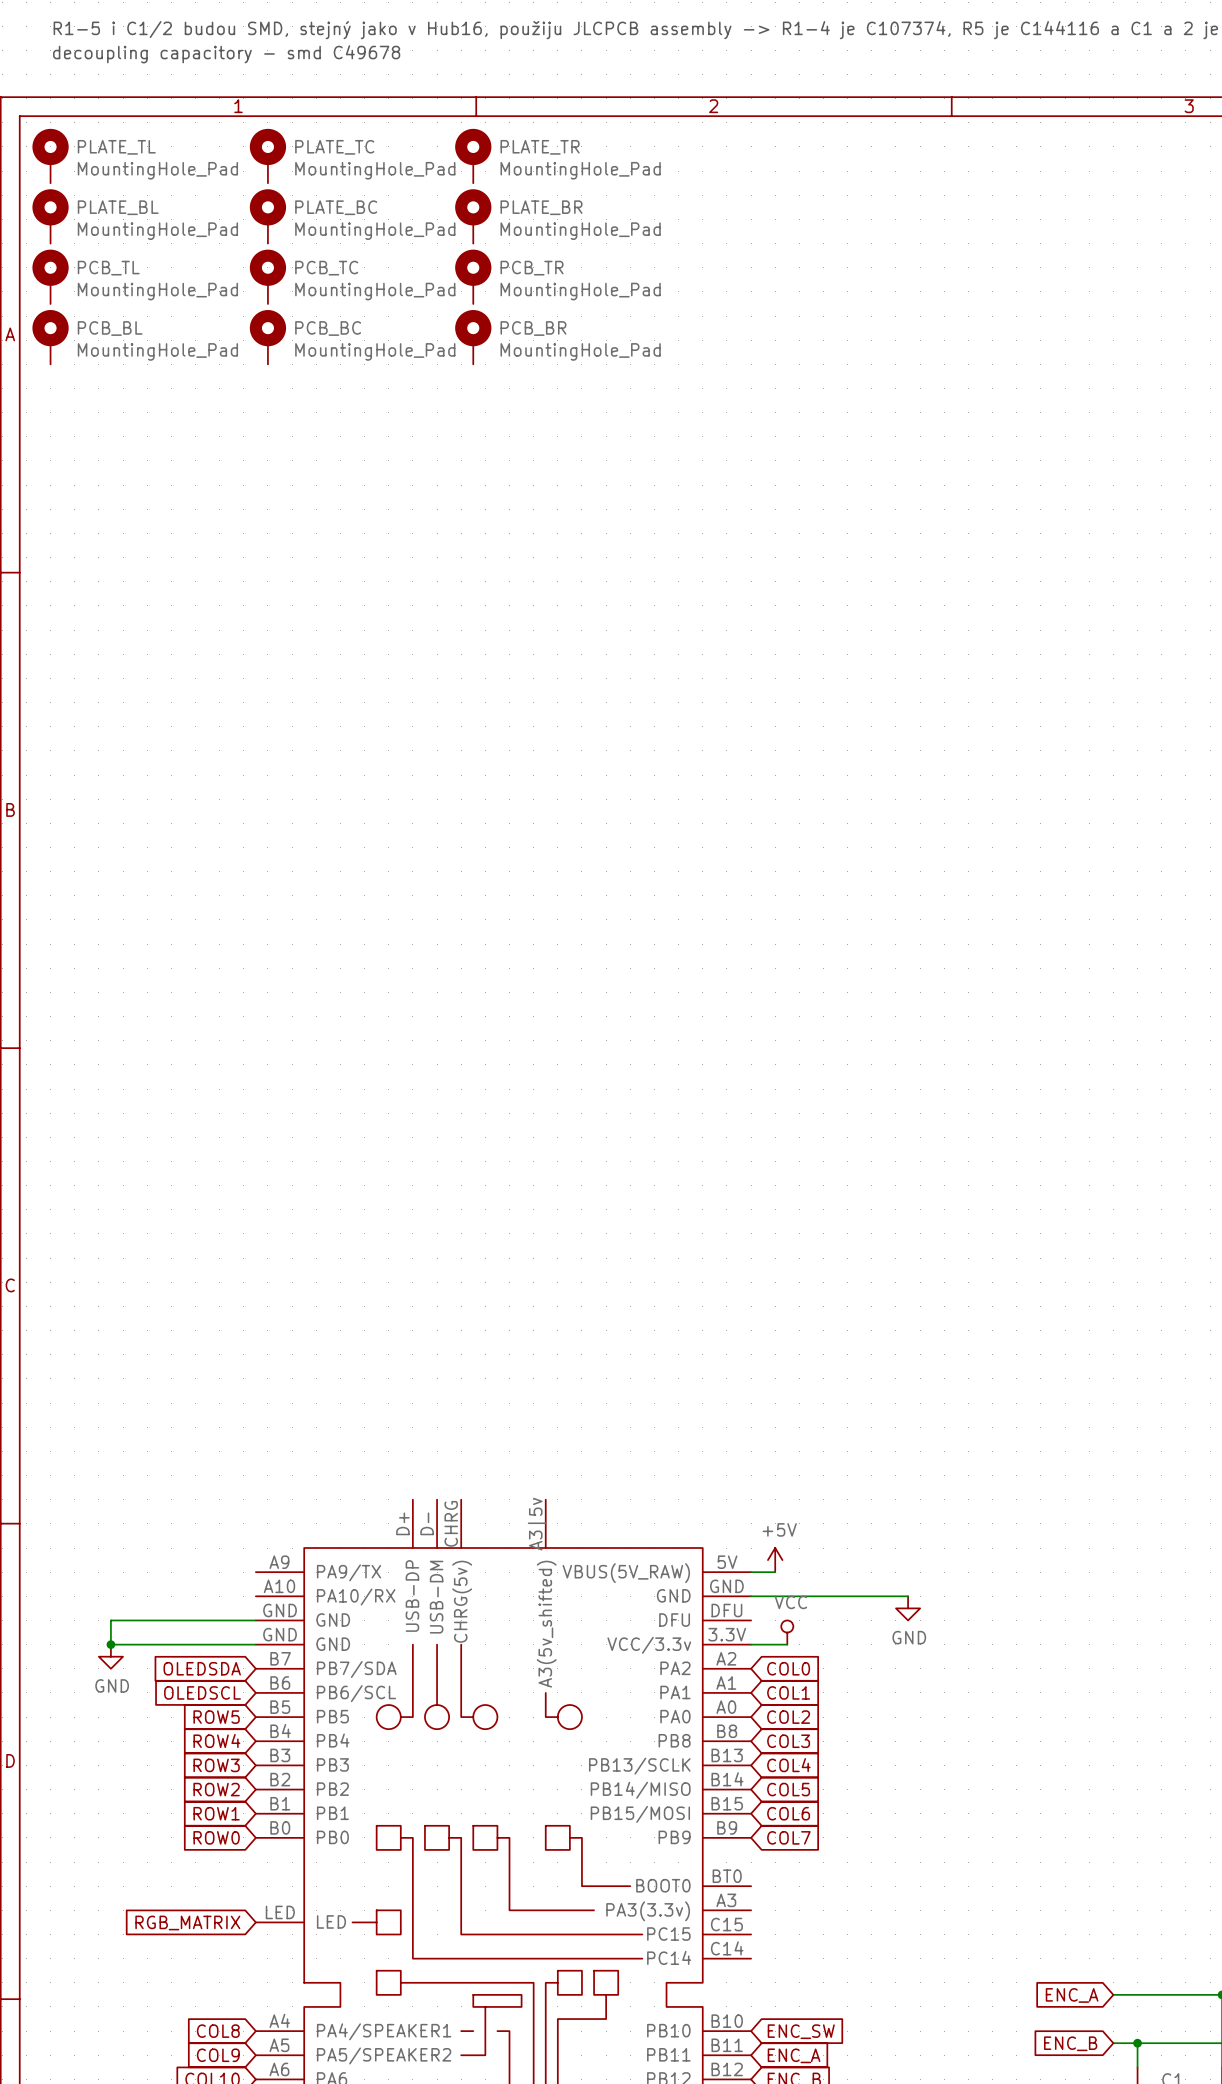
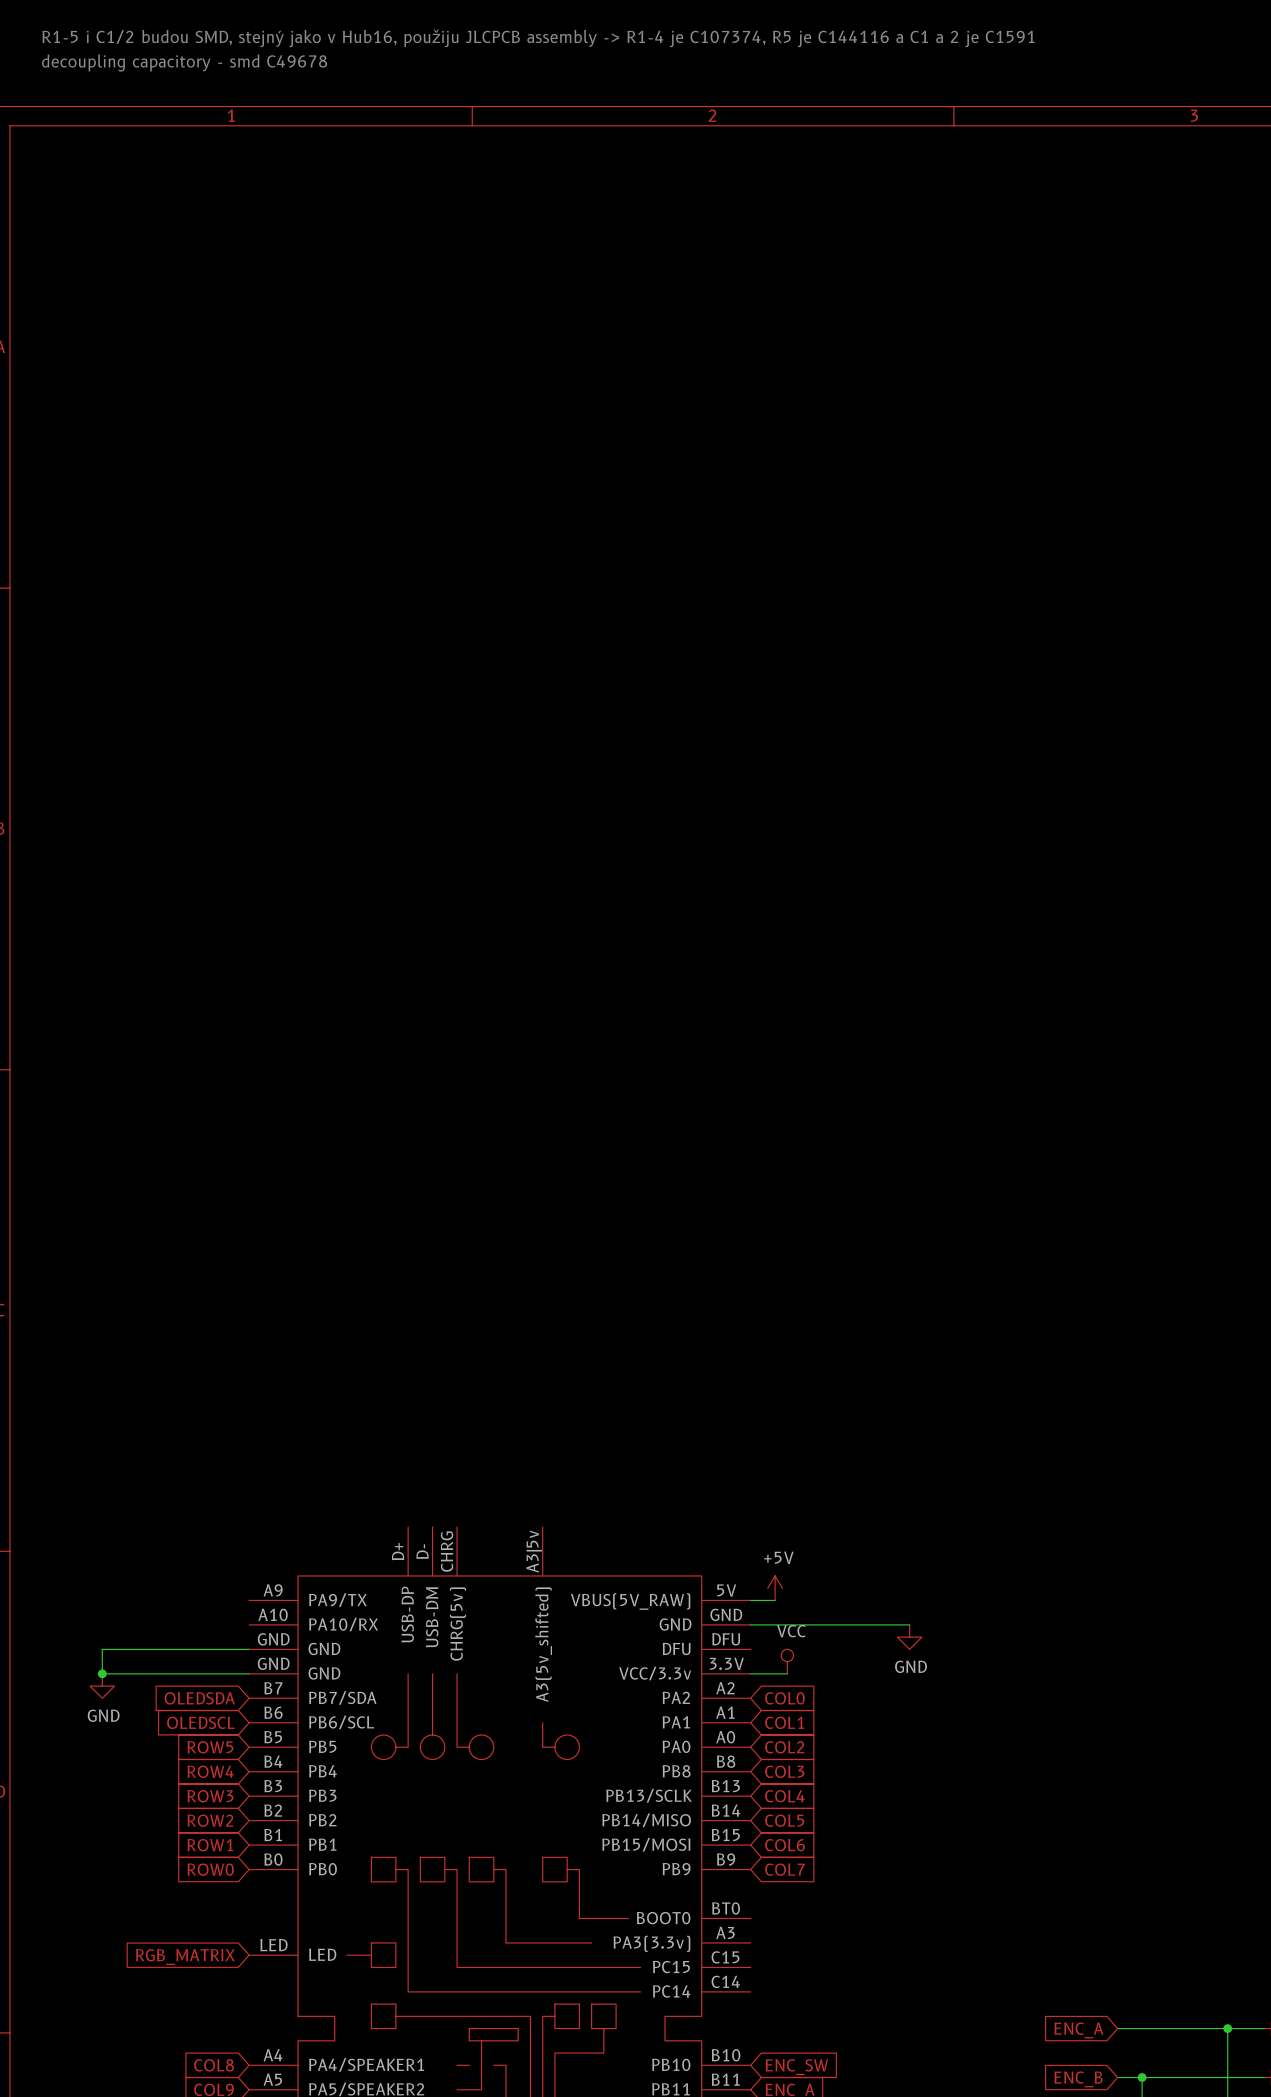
PLATE_TL: MountingHole_Pad (50, 156) -> none
PLATE_TC: MountingHole_Pad (267, 156) -> none
PLATE_TR: MountingHole_Pad (473, 156) -> none
PLATE_BL: MountingHole_Pad (50, 216) -> none
PLATE_BC: MountingHole_Pad (267, 216) -> none
PLATE_BR: MountingHole_Pad (473, 216) -> none
PCB_TL: MountingHole_Pad (50, 276) -> none
PCB_TC: MountingHole_Pad (267, 276) -> none
PCB_TR: MountingHole_Pad (473, 276) -> none
PCB_BL: MountingHole_Pad (50, 337) -> none
PCB_BC: MountingHole_Pad (267, 337) -> none
PCB_BR: MountingHole_Pad (473, 337) -> none

